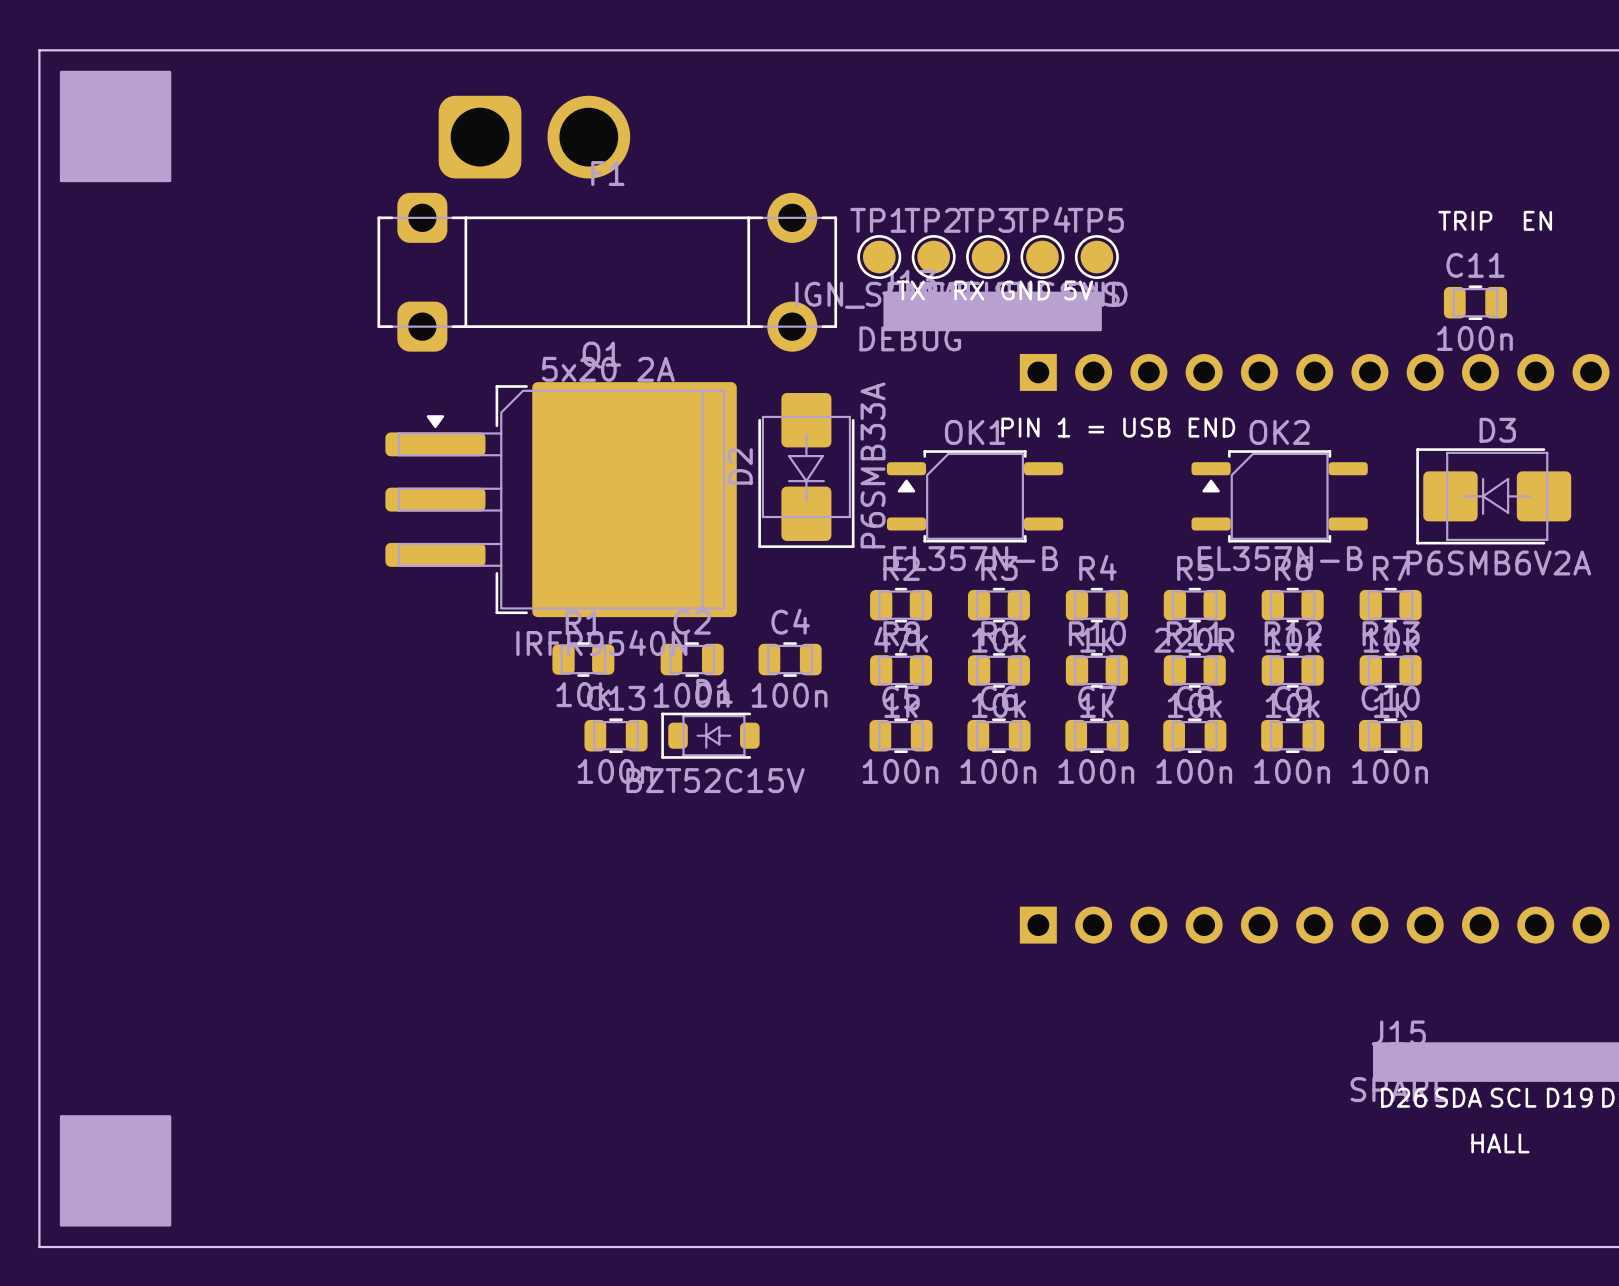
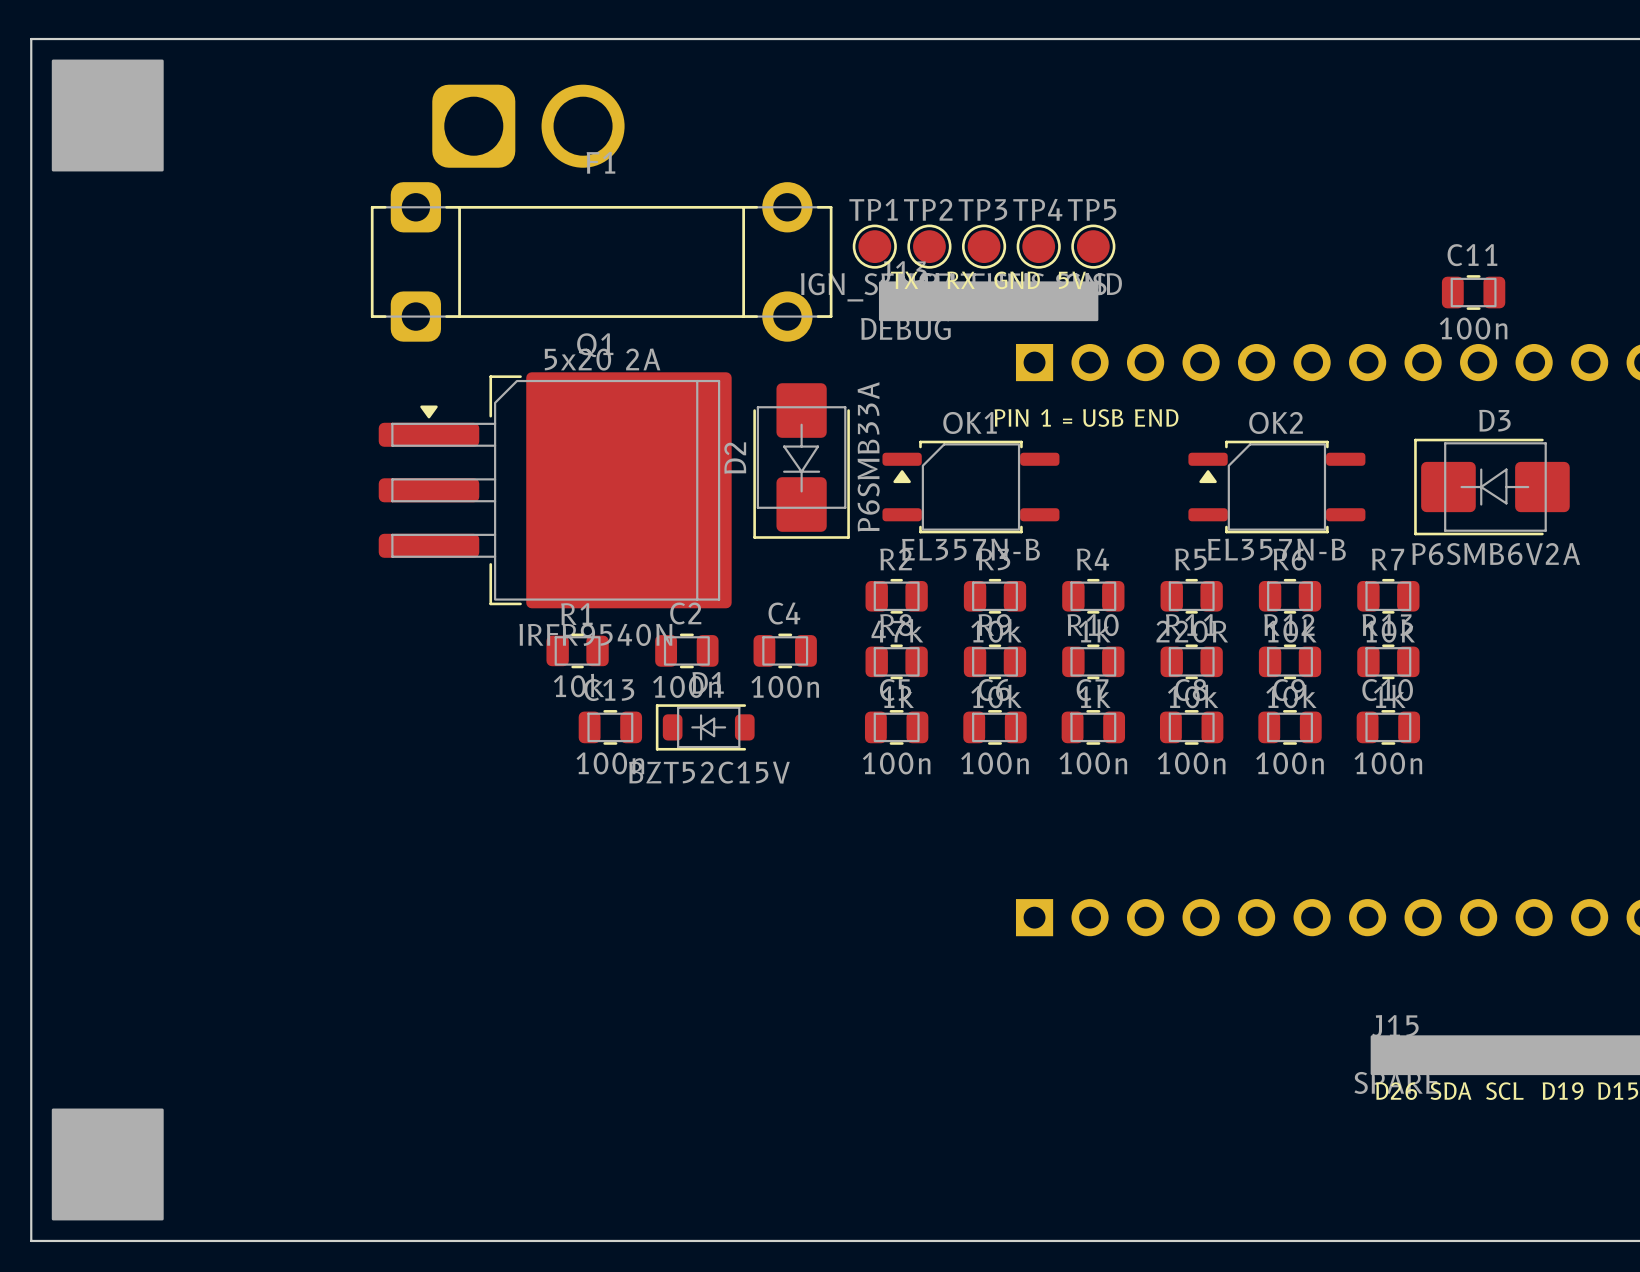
text: TRIP EN (1495, 220) -> none
text: HALL (1500, 1143) -> none

